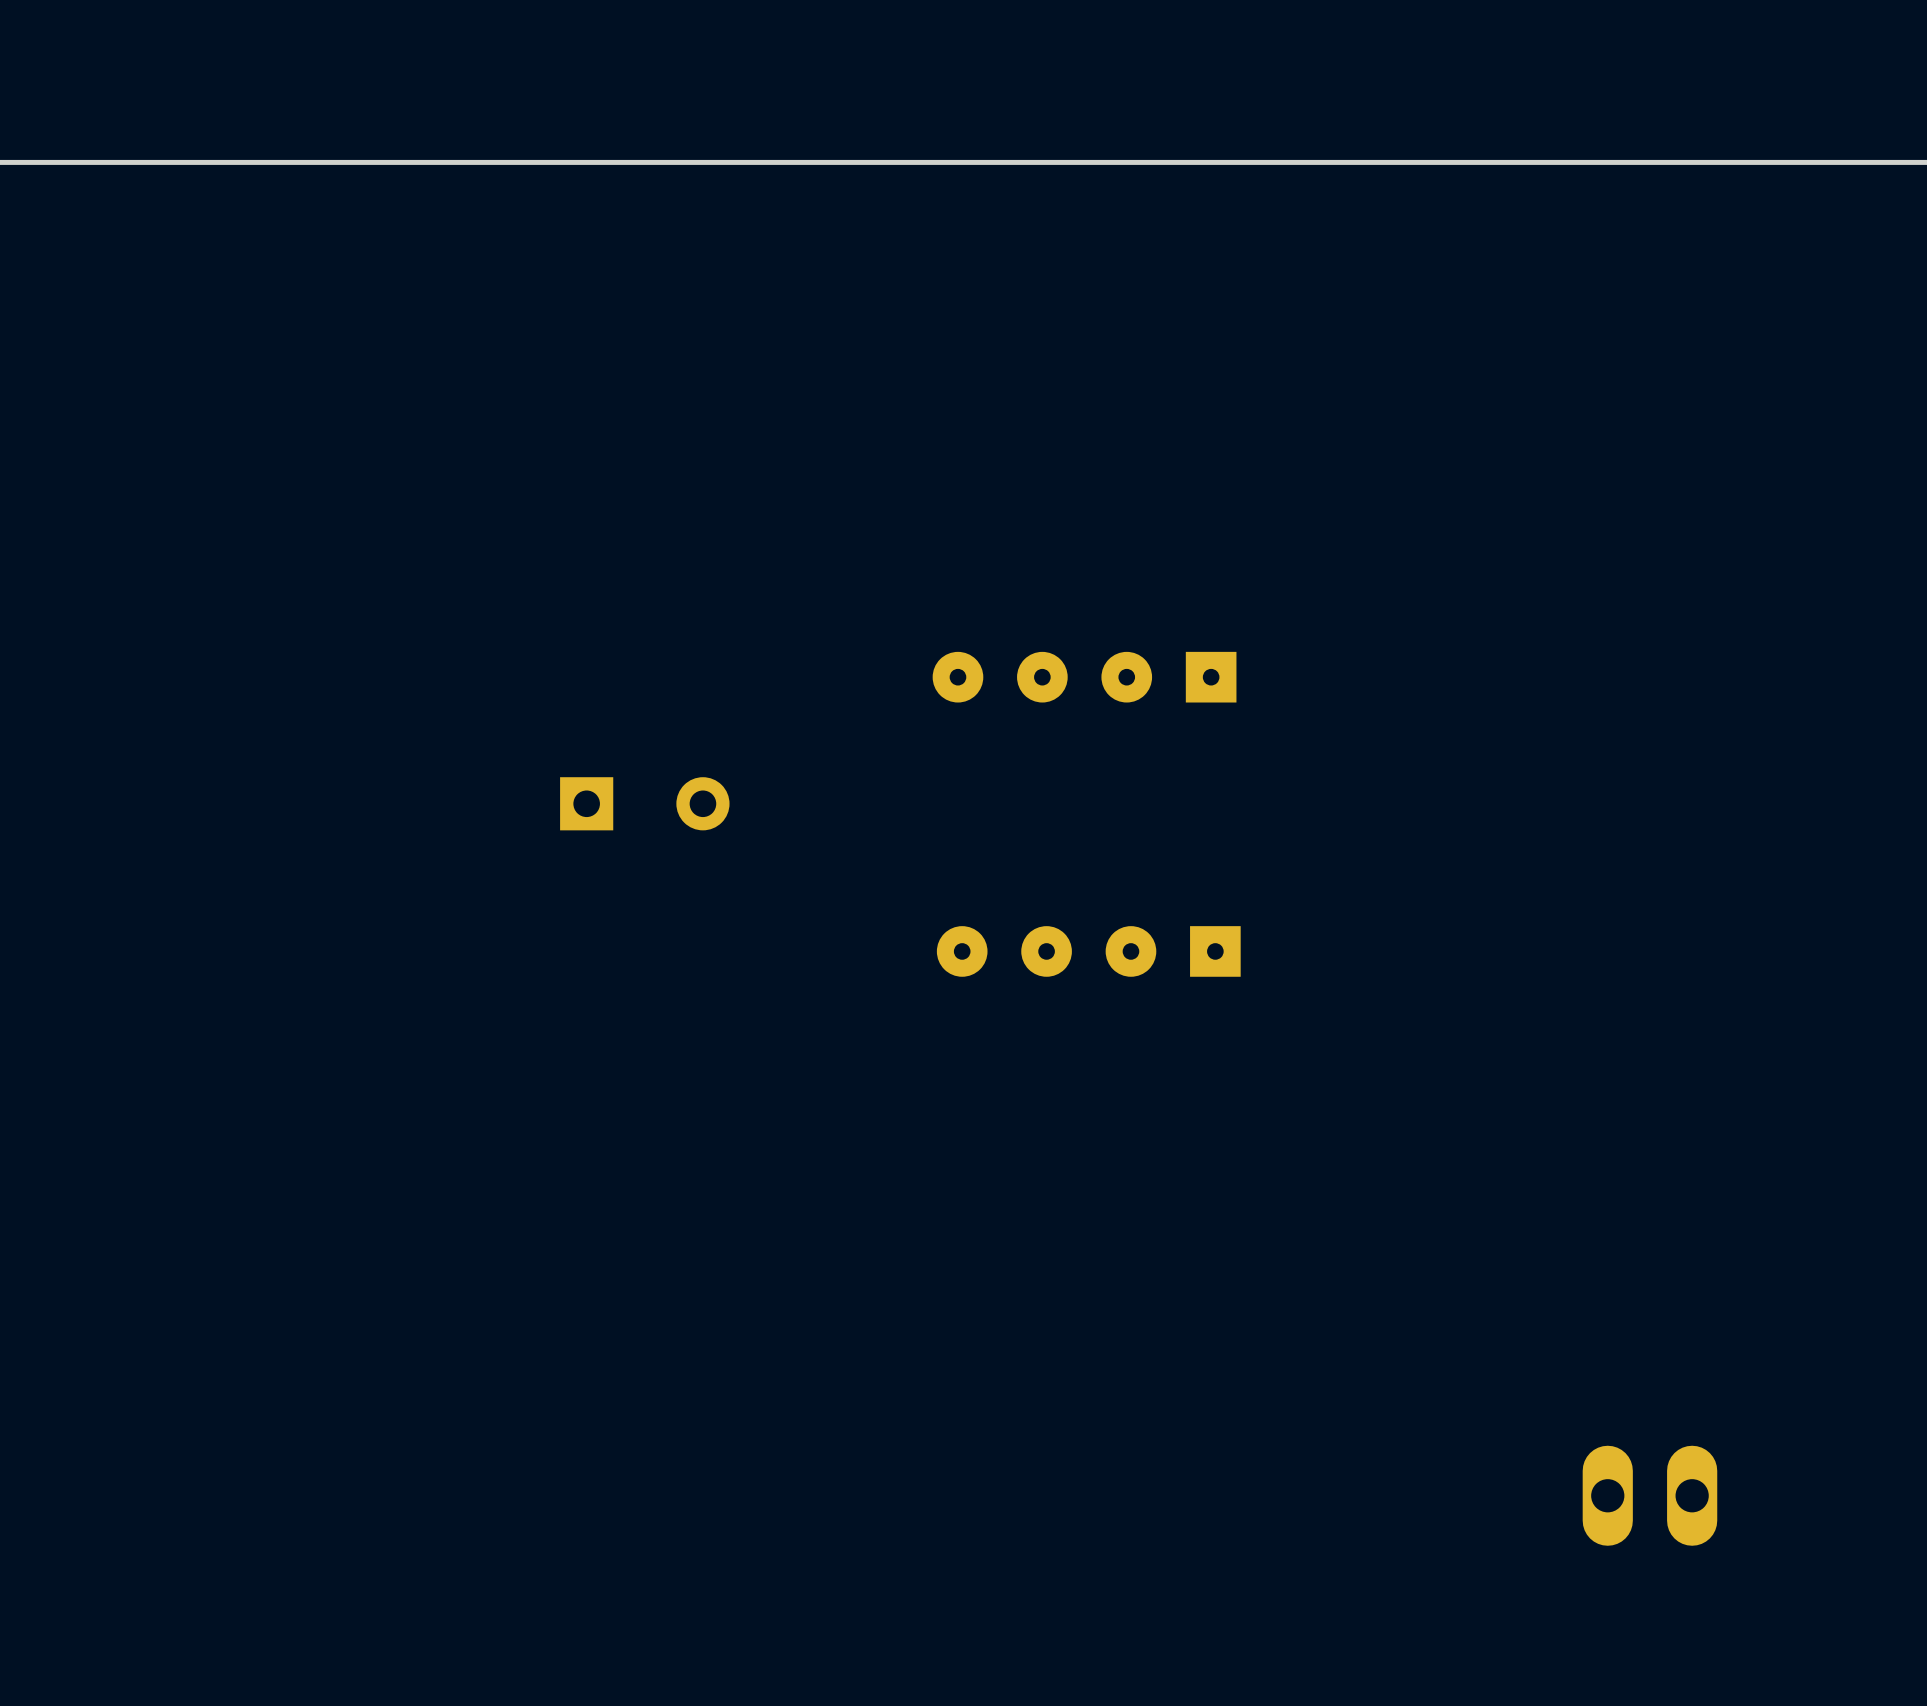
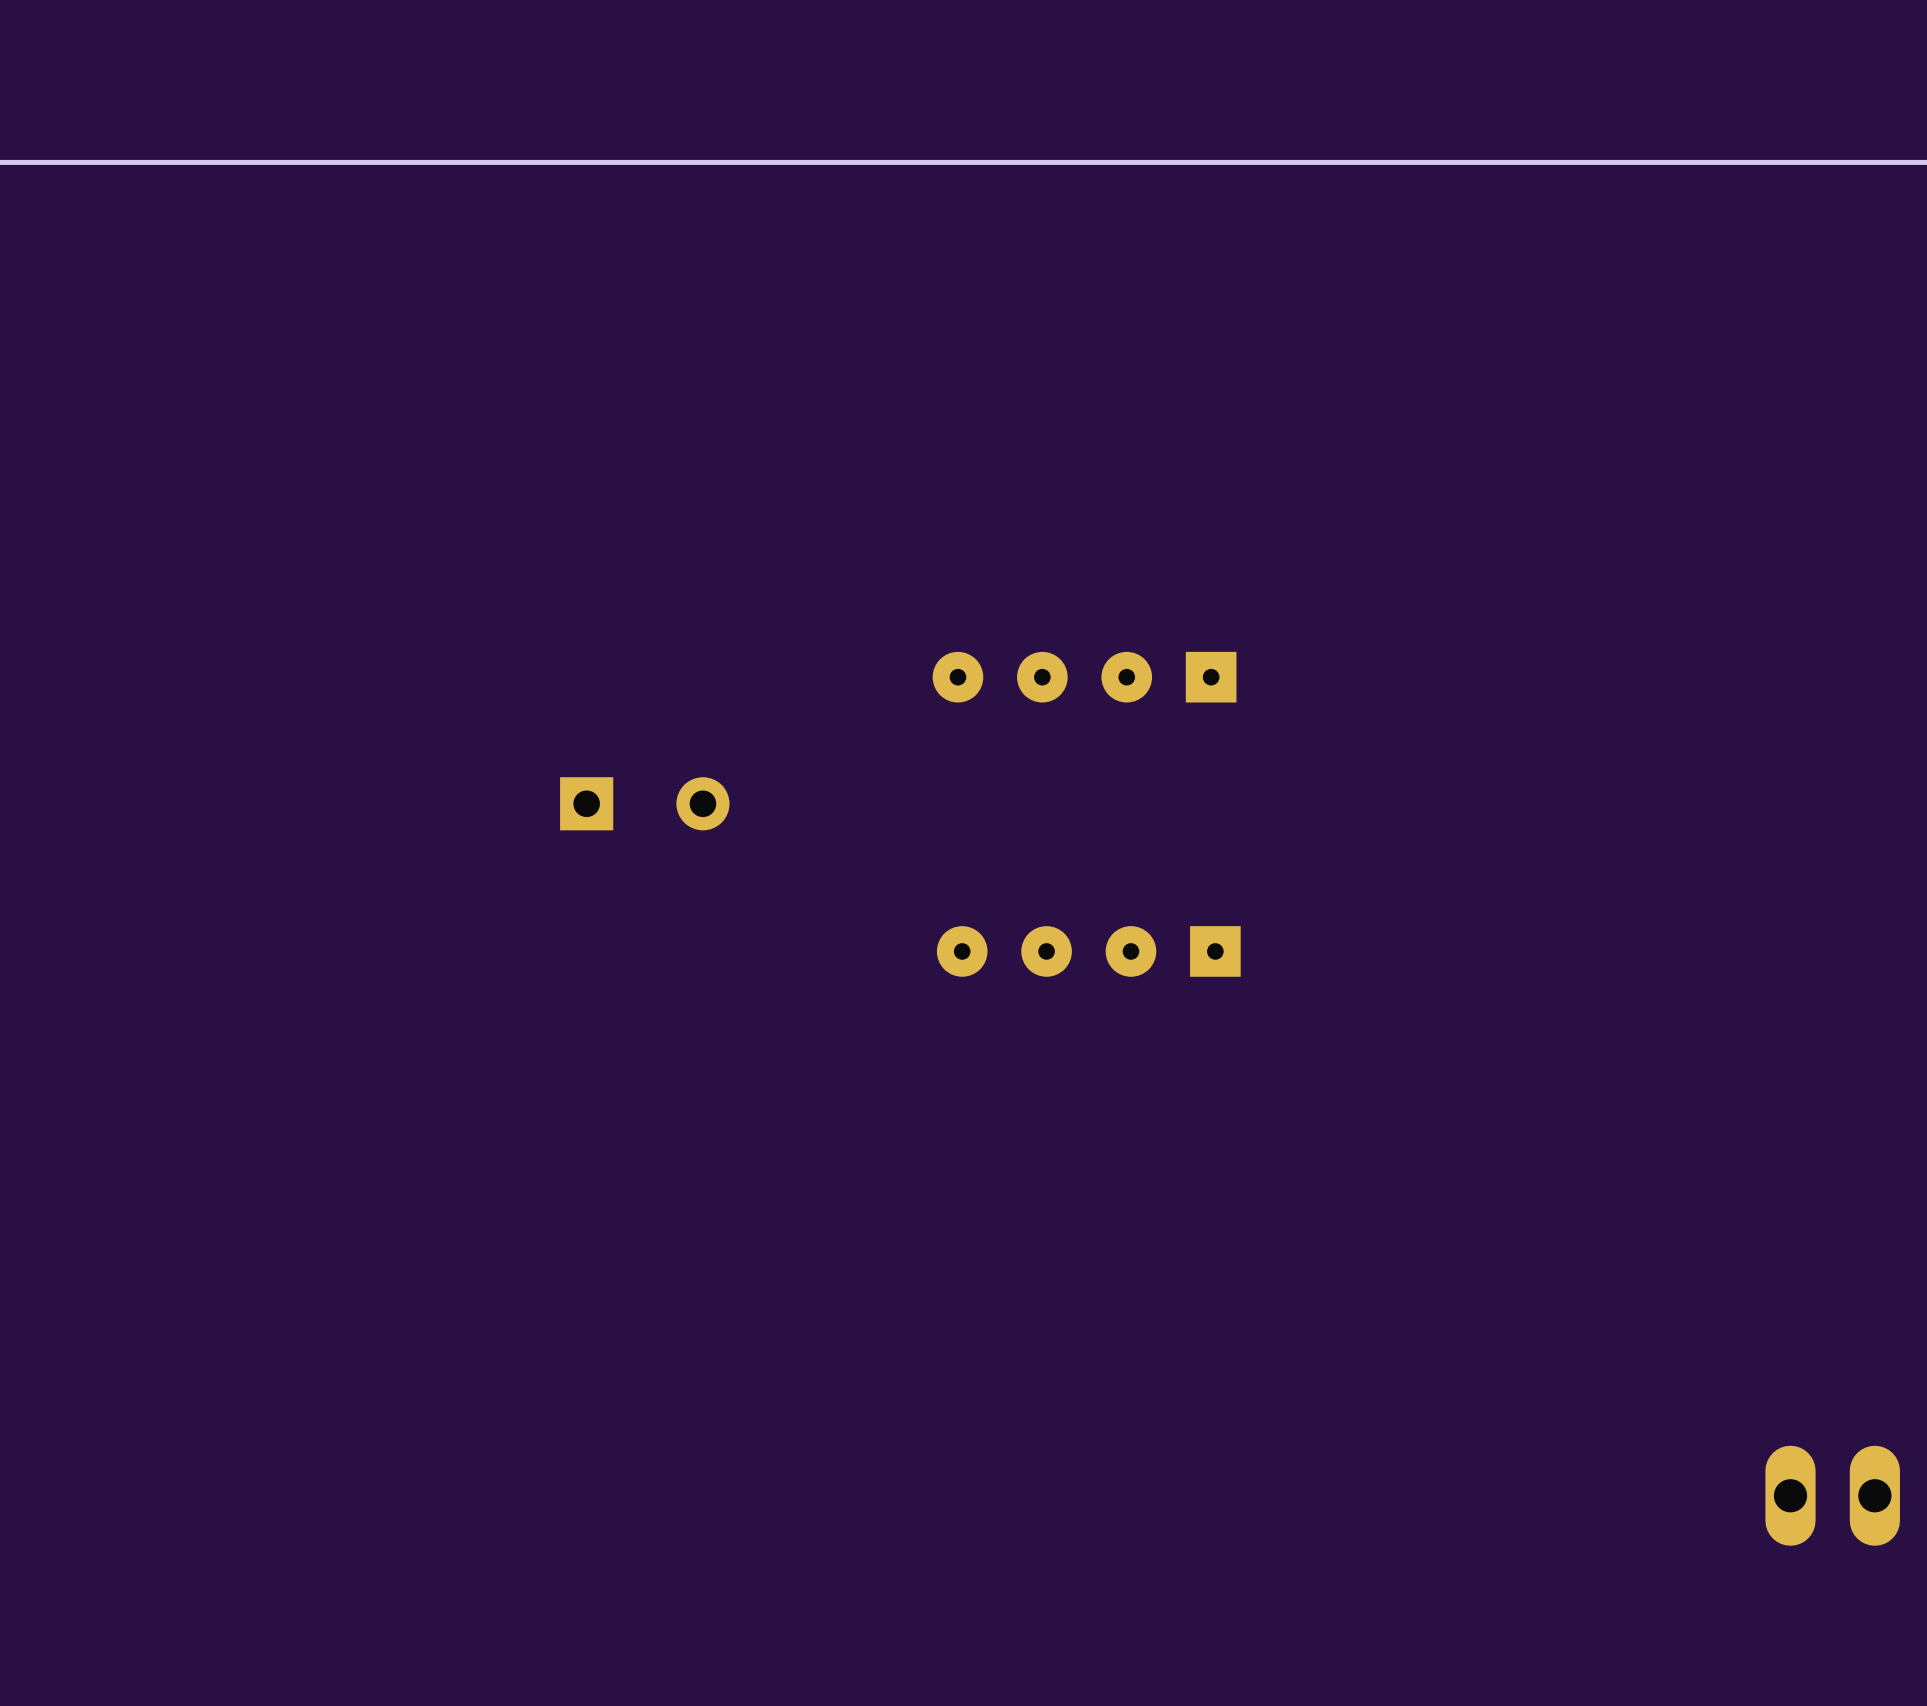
part position: (1649, 1495) -> (1832, 1495)

